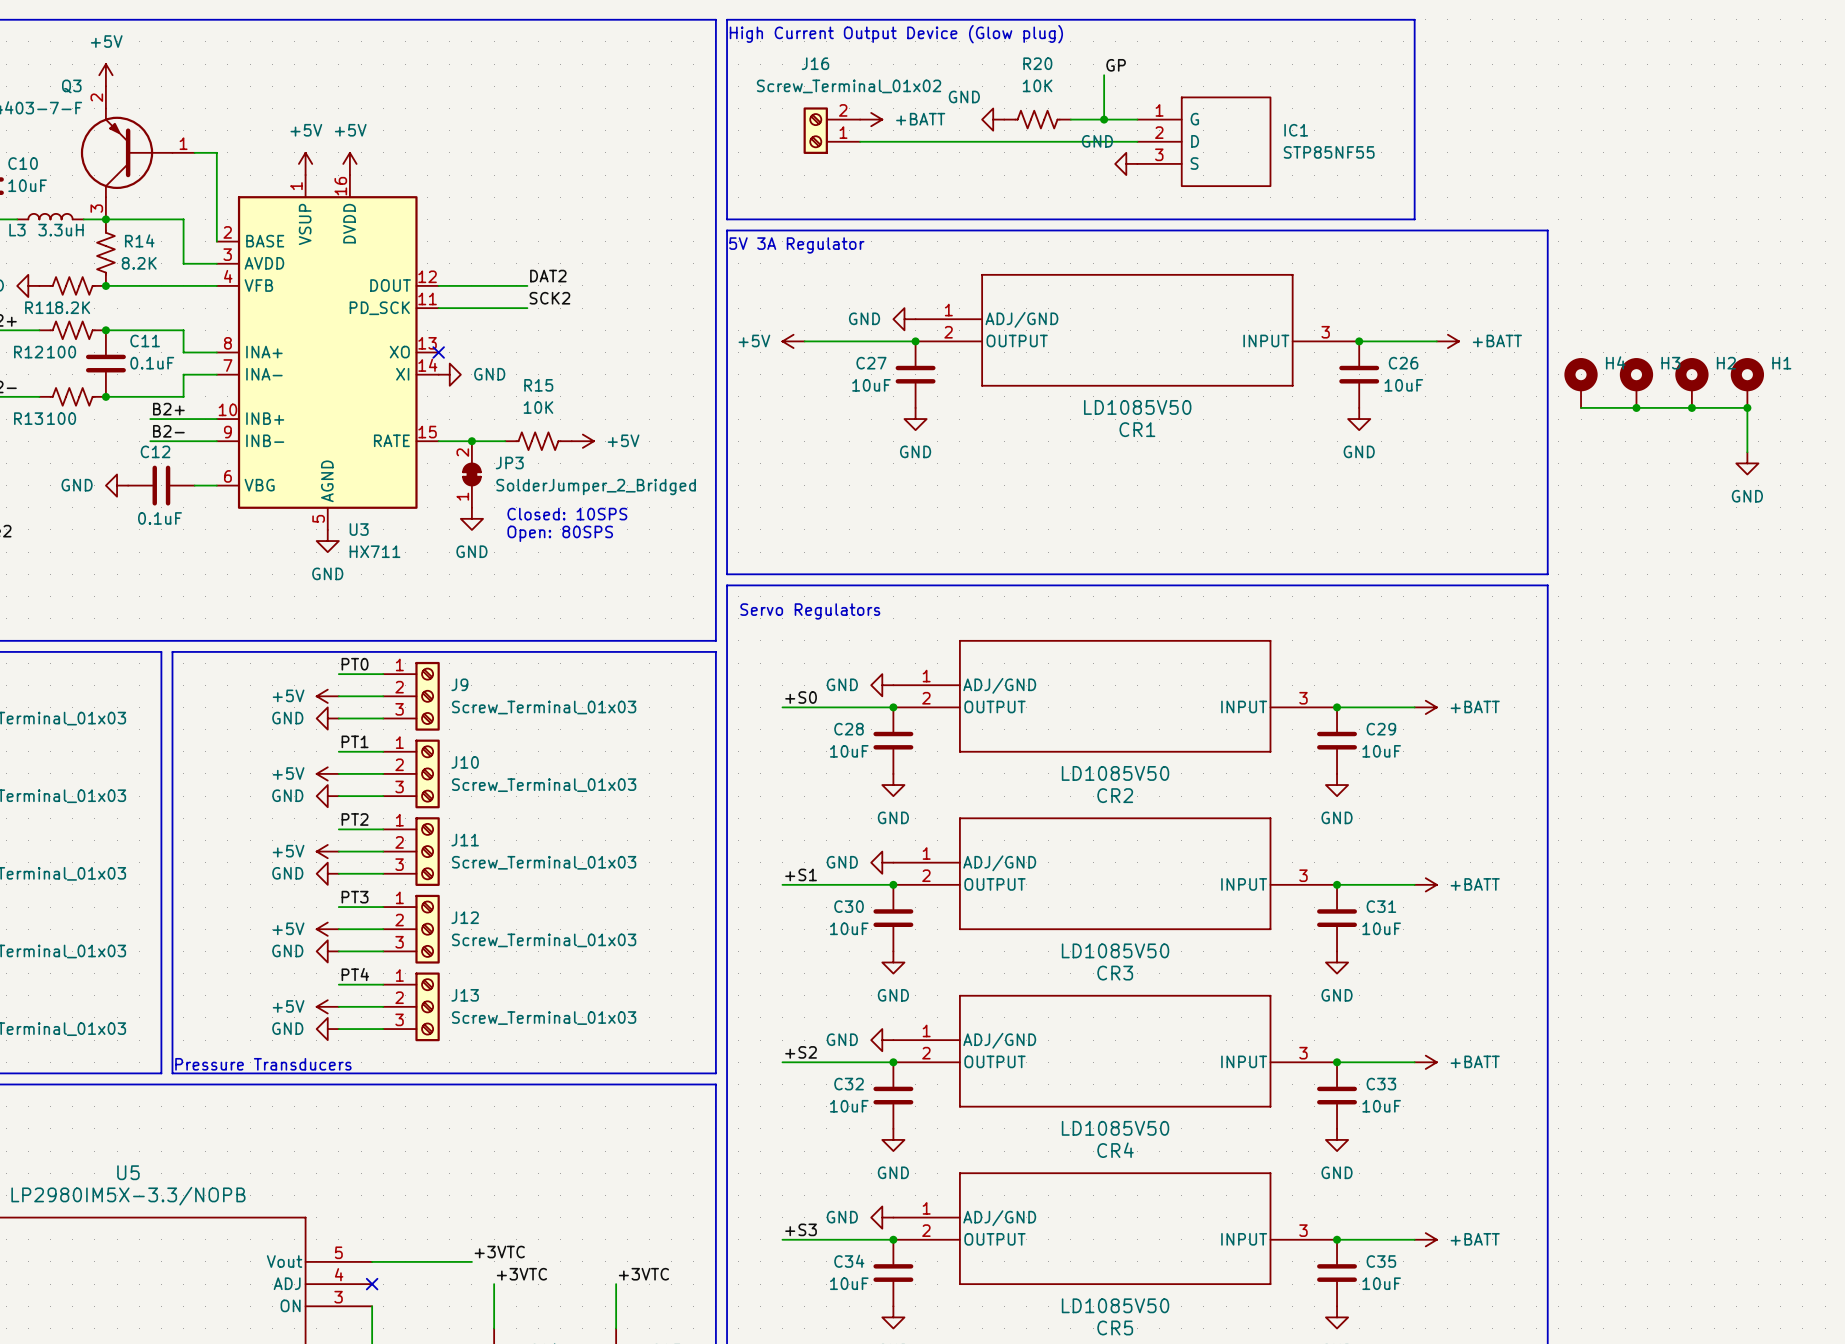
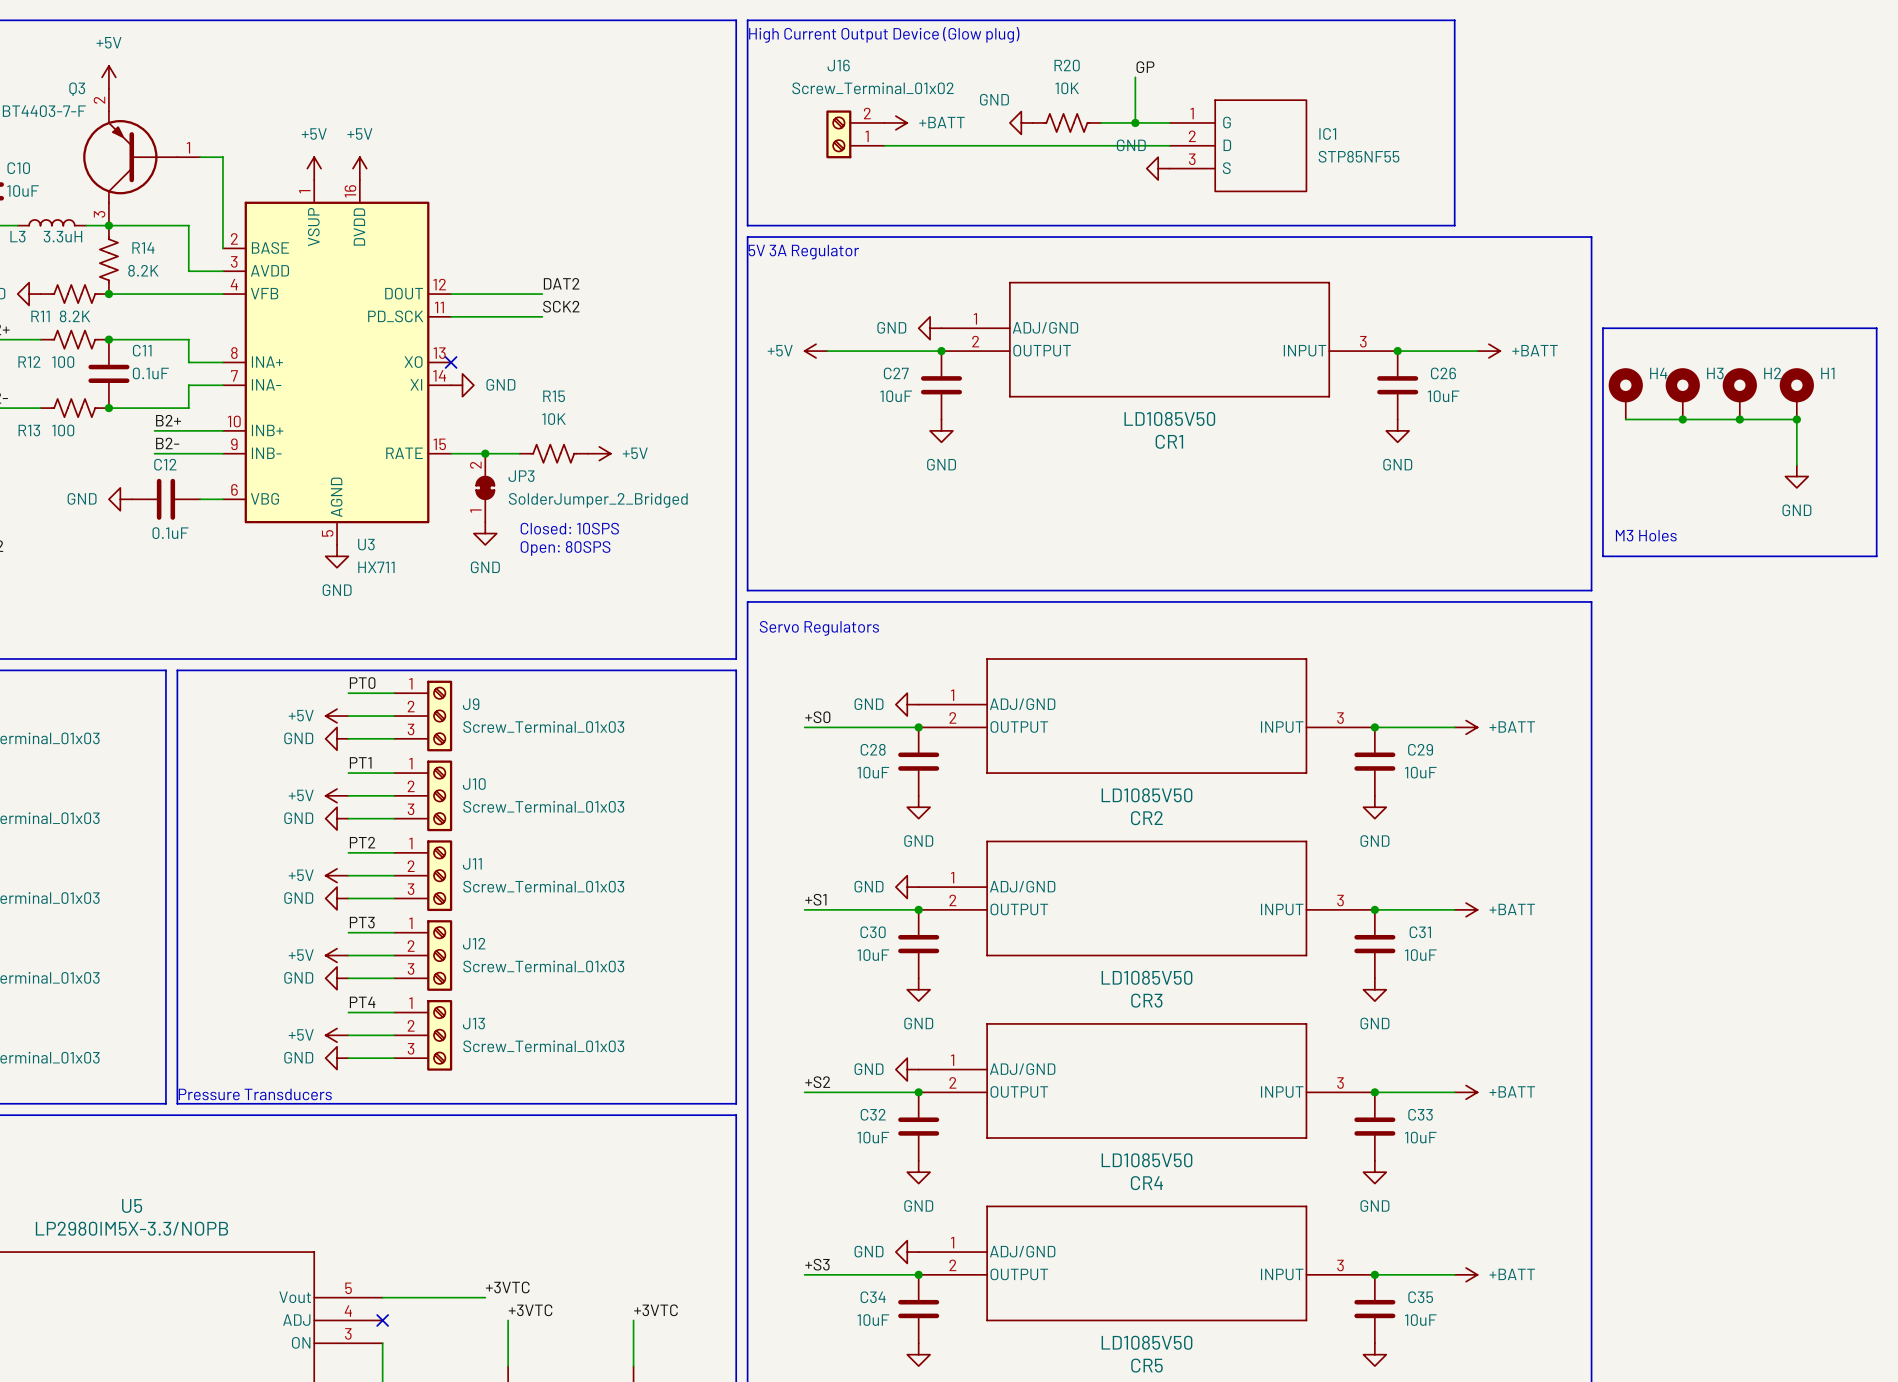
line: none -> (1602, 328) (1876, 328) (1876, 556) (1602, 556) (1602, 328)
text: none -> M3 Holes (1646, 535)

